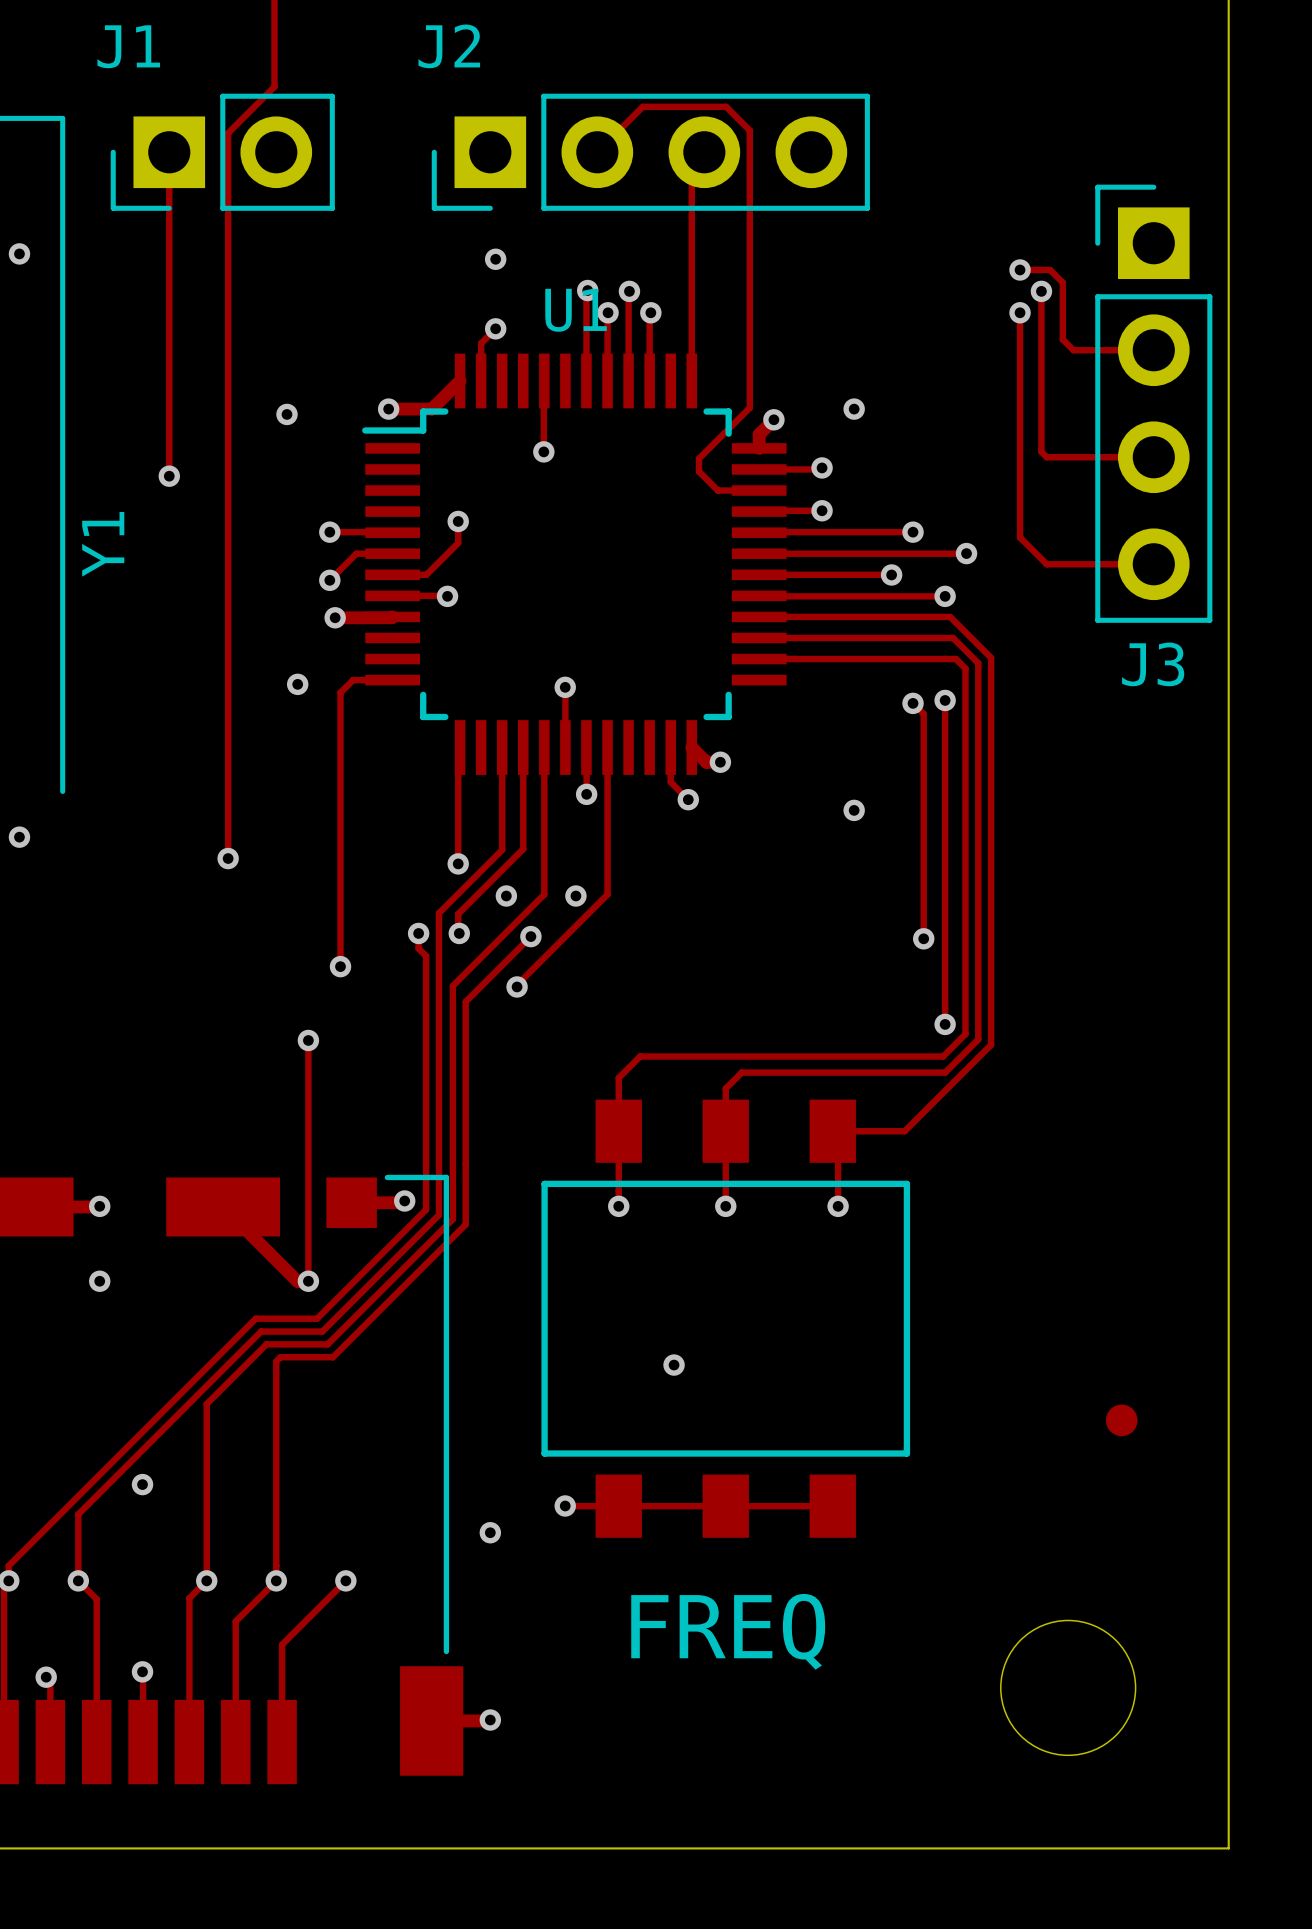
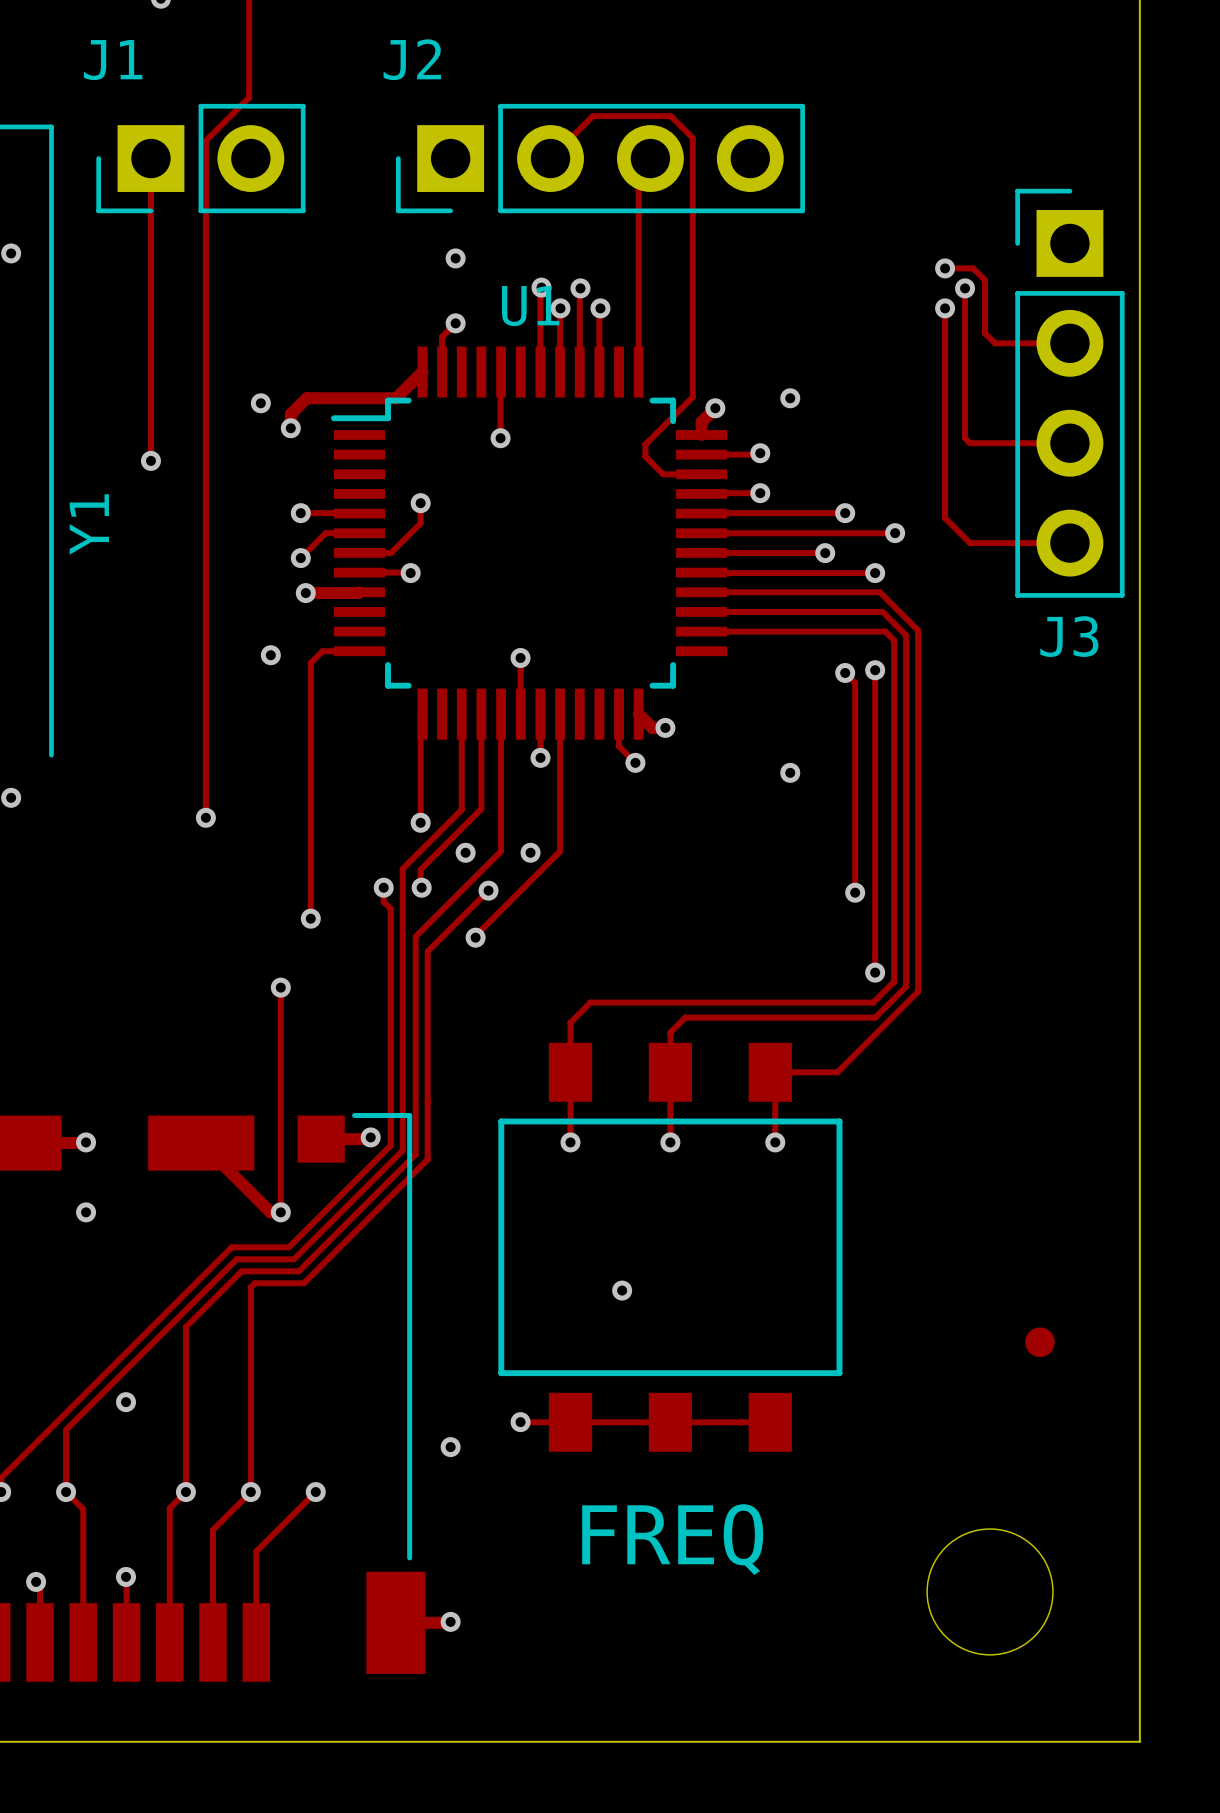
track: none -> (355, 398) (306, 398) (290, 414) (290, 428)
via position: (388, 409) -> (290, 428)

